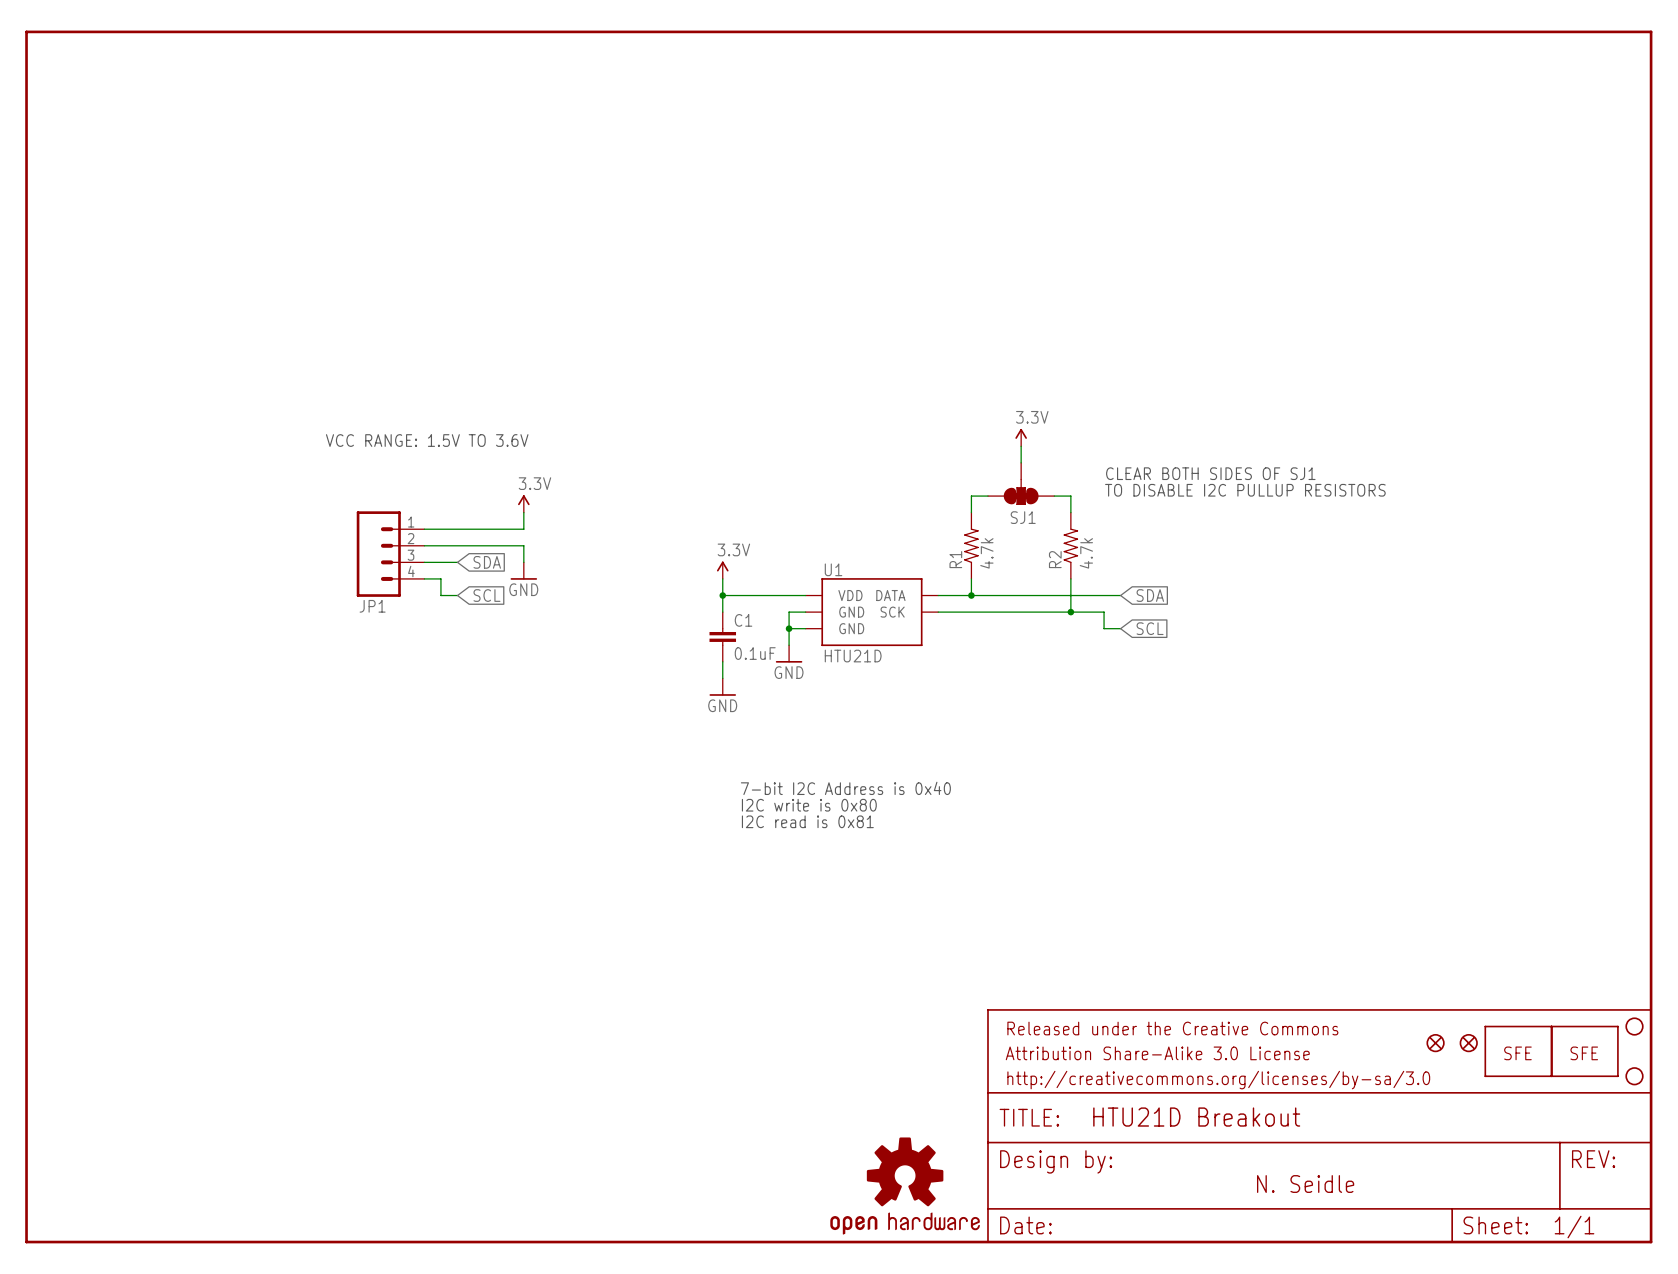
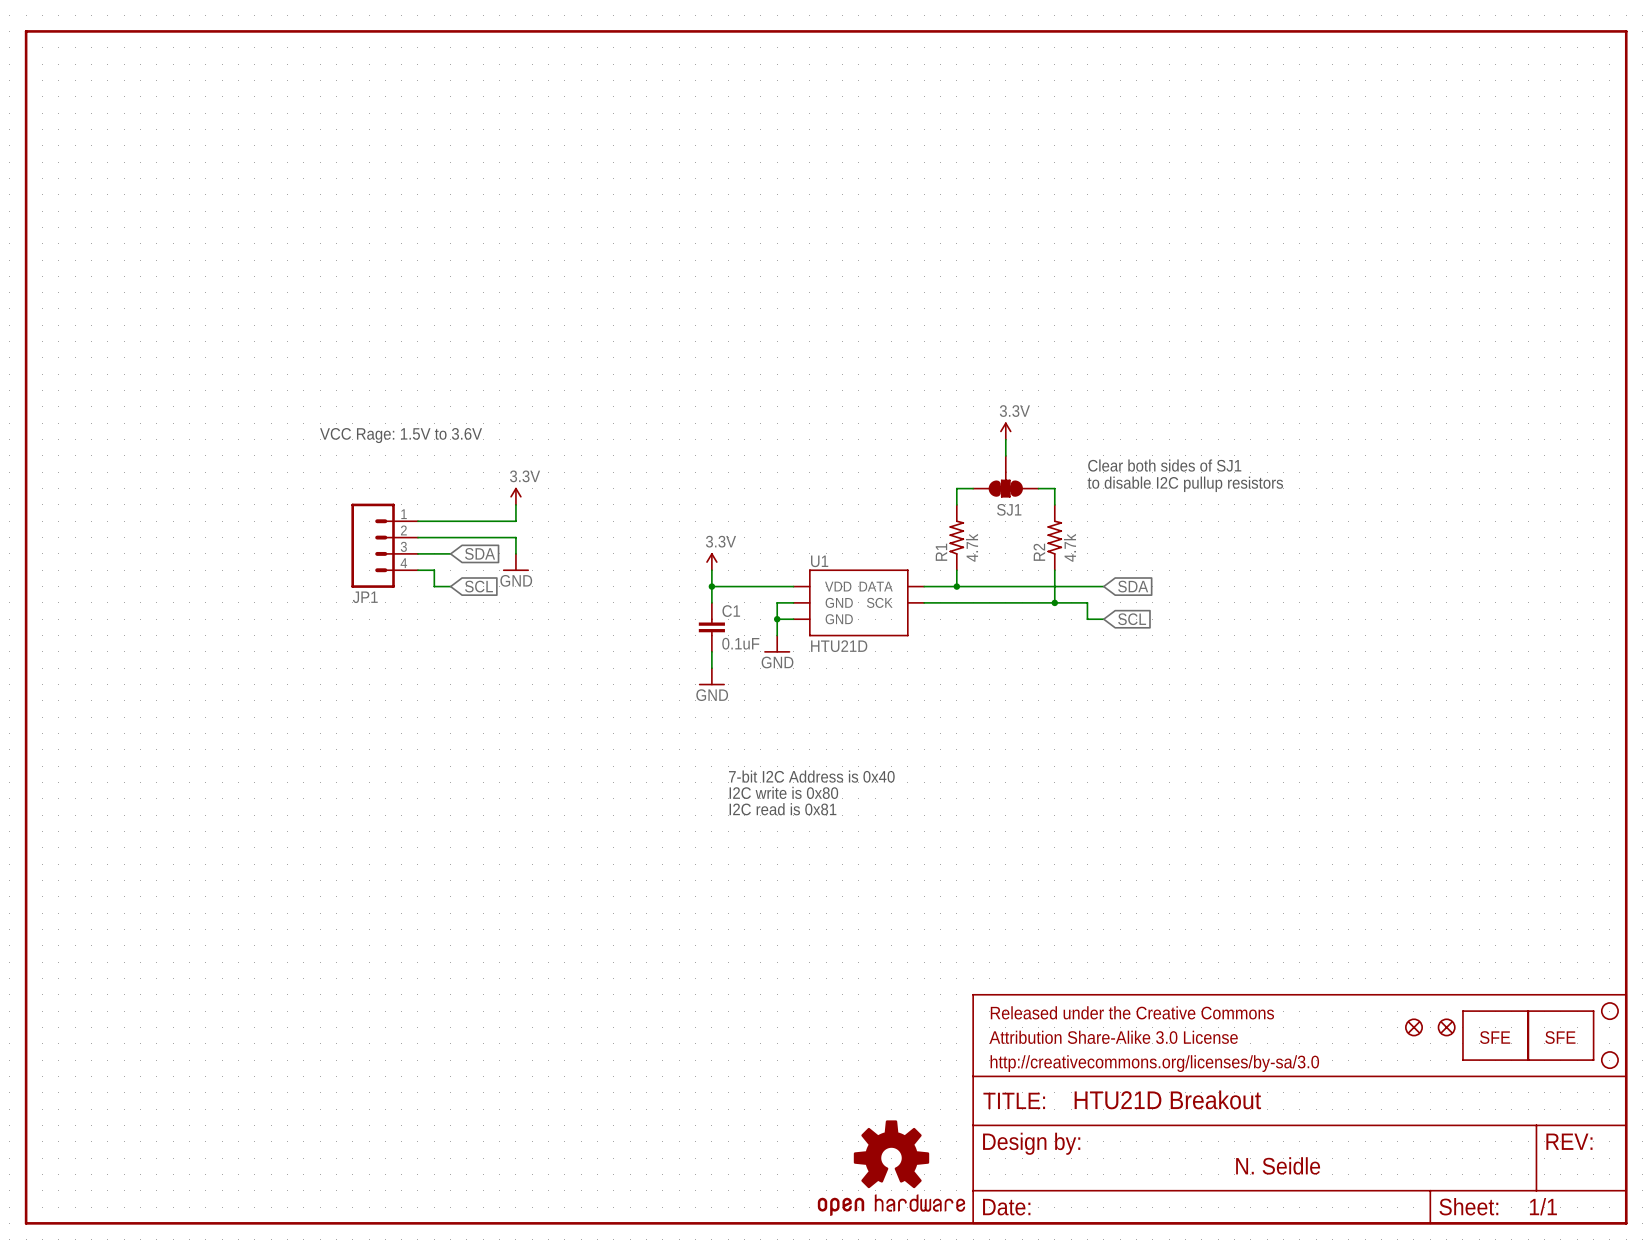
text: VCC RANGE: 1.5V TO 3.6V (427, 440) -> VCC Rage: 1.5V to 3.6V (401, 435)
text: CLEAR BOTH SIDES OF SJ1 (1210, 473) -> Clear both sides of SJ1 (1164, 465)
text: TO DISABLE I2C PULLUP RESISTORS (1245, 490) -> to disable I2C pullup resistors (1185, 484)

